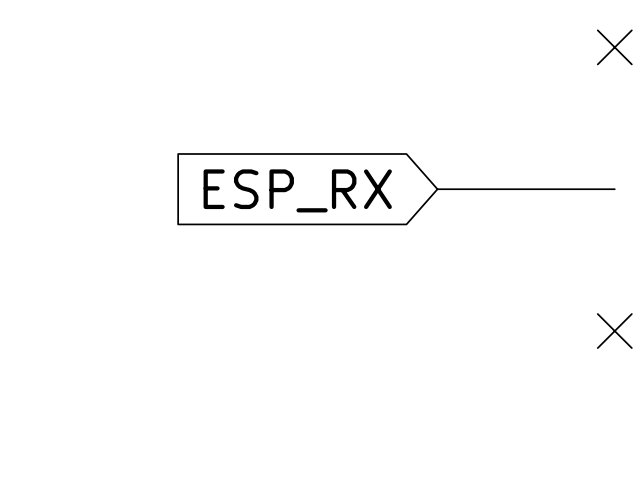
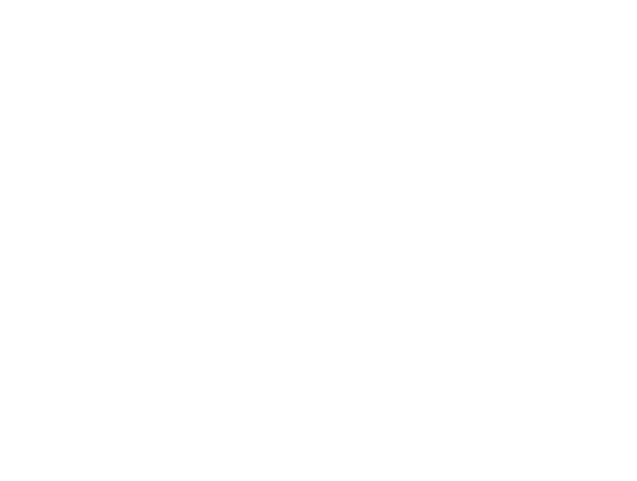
no-connect mark: (614, 47) -> none
wire: (437, 189) (614, 189) -> none
global label: ESP_RX (297, 190) -> none
no-connect mark: (614, 331) -> none

